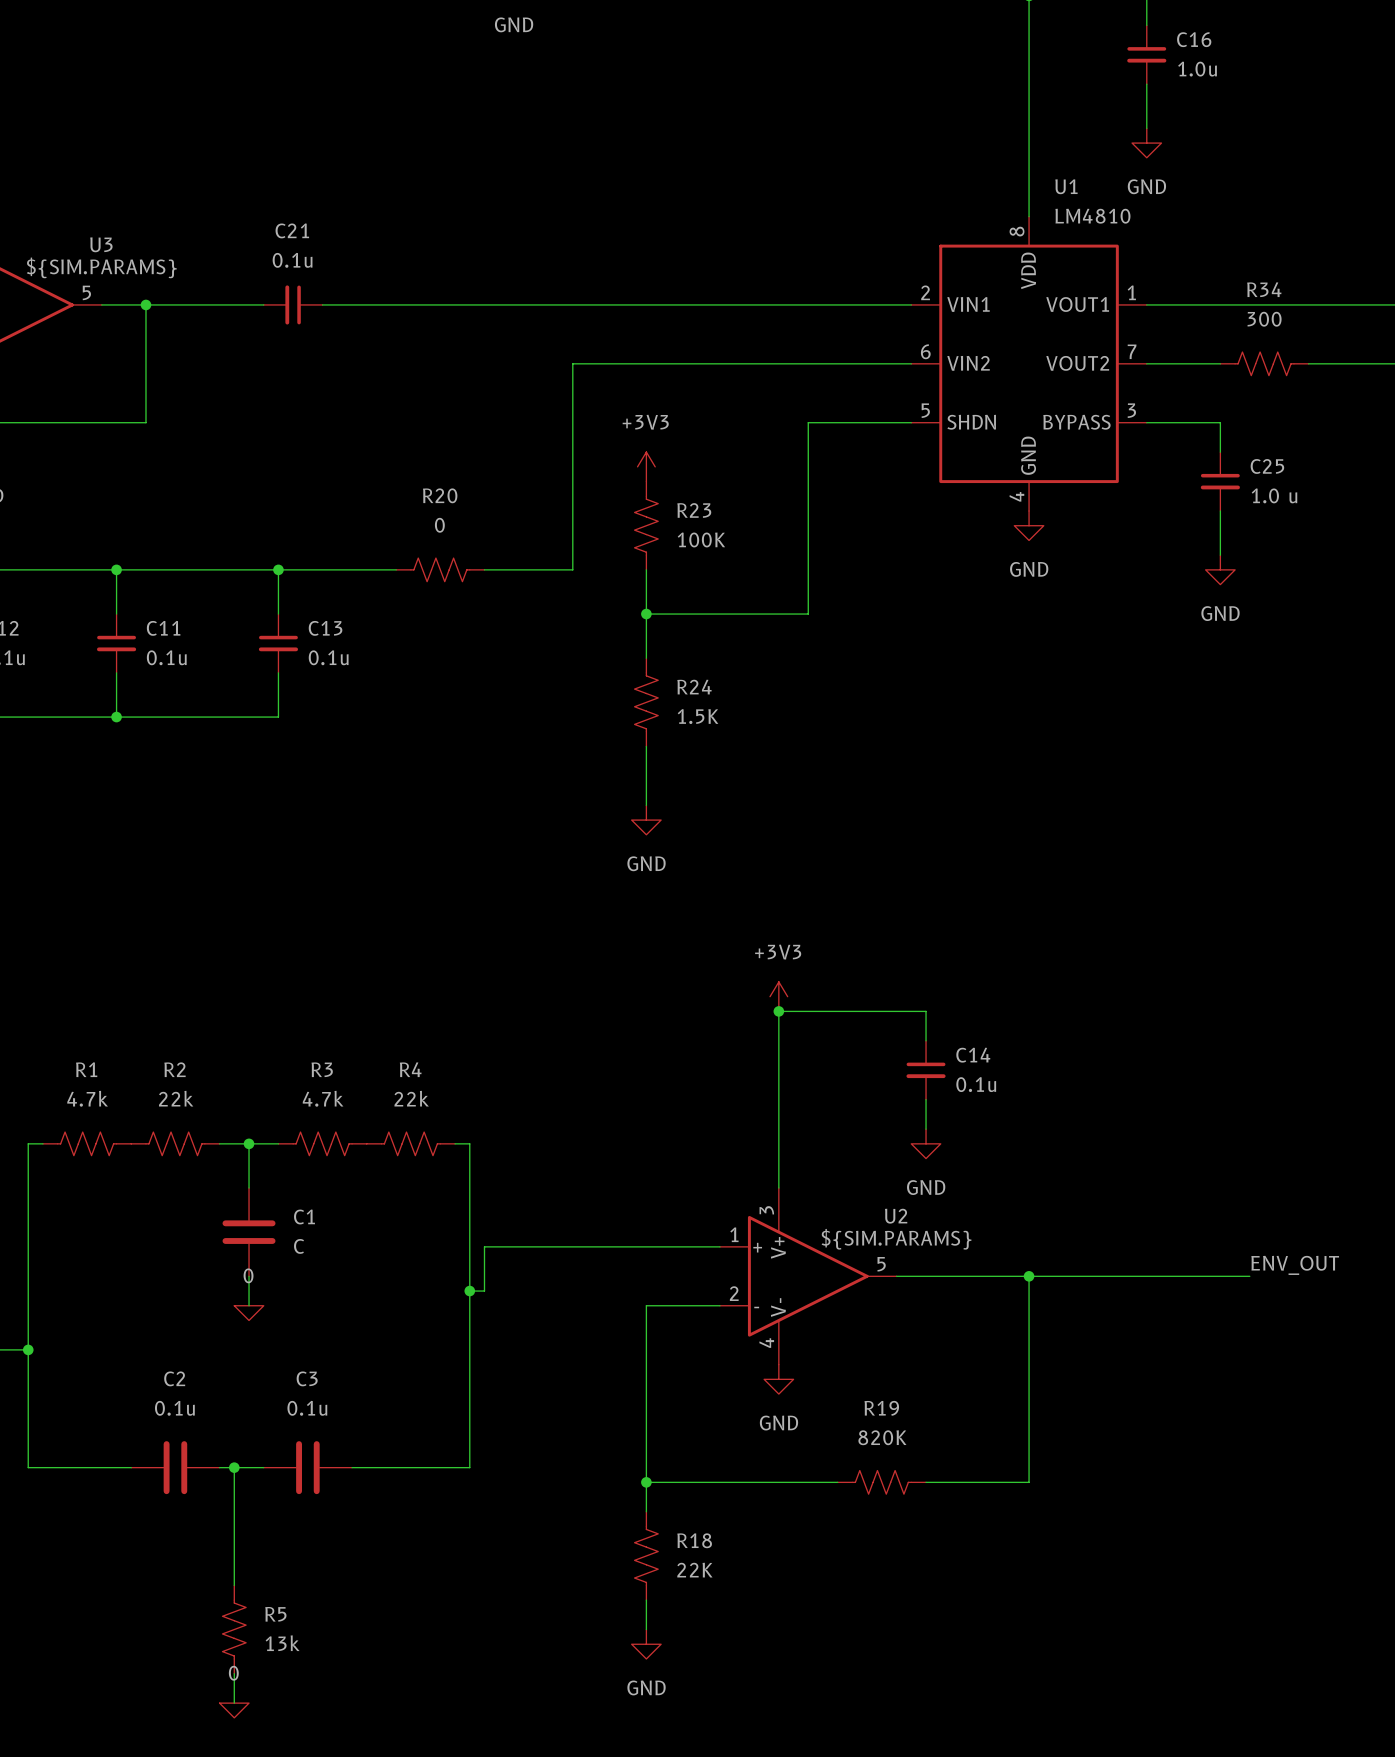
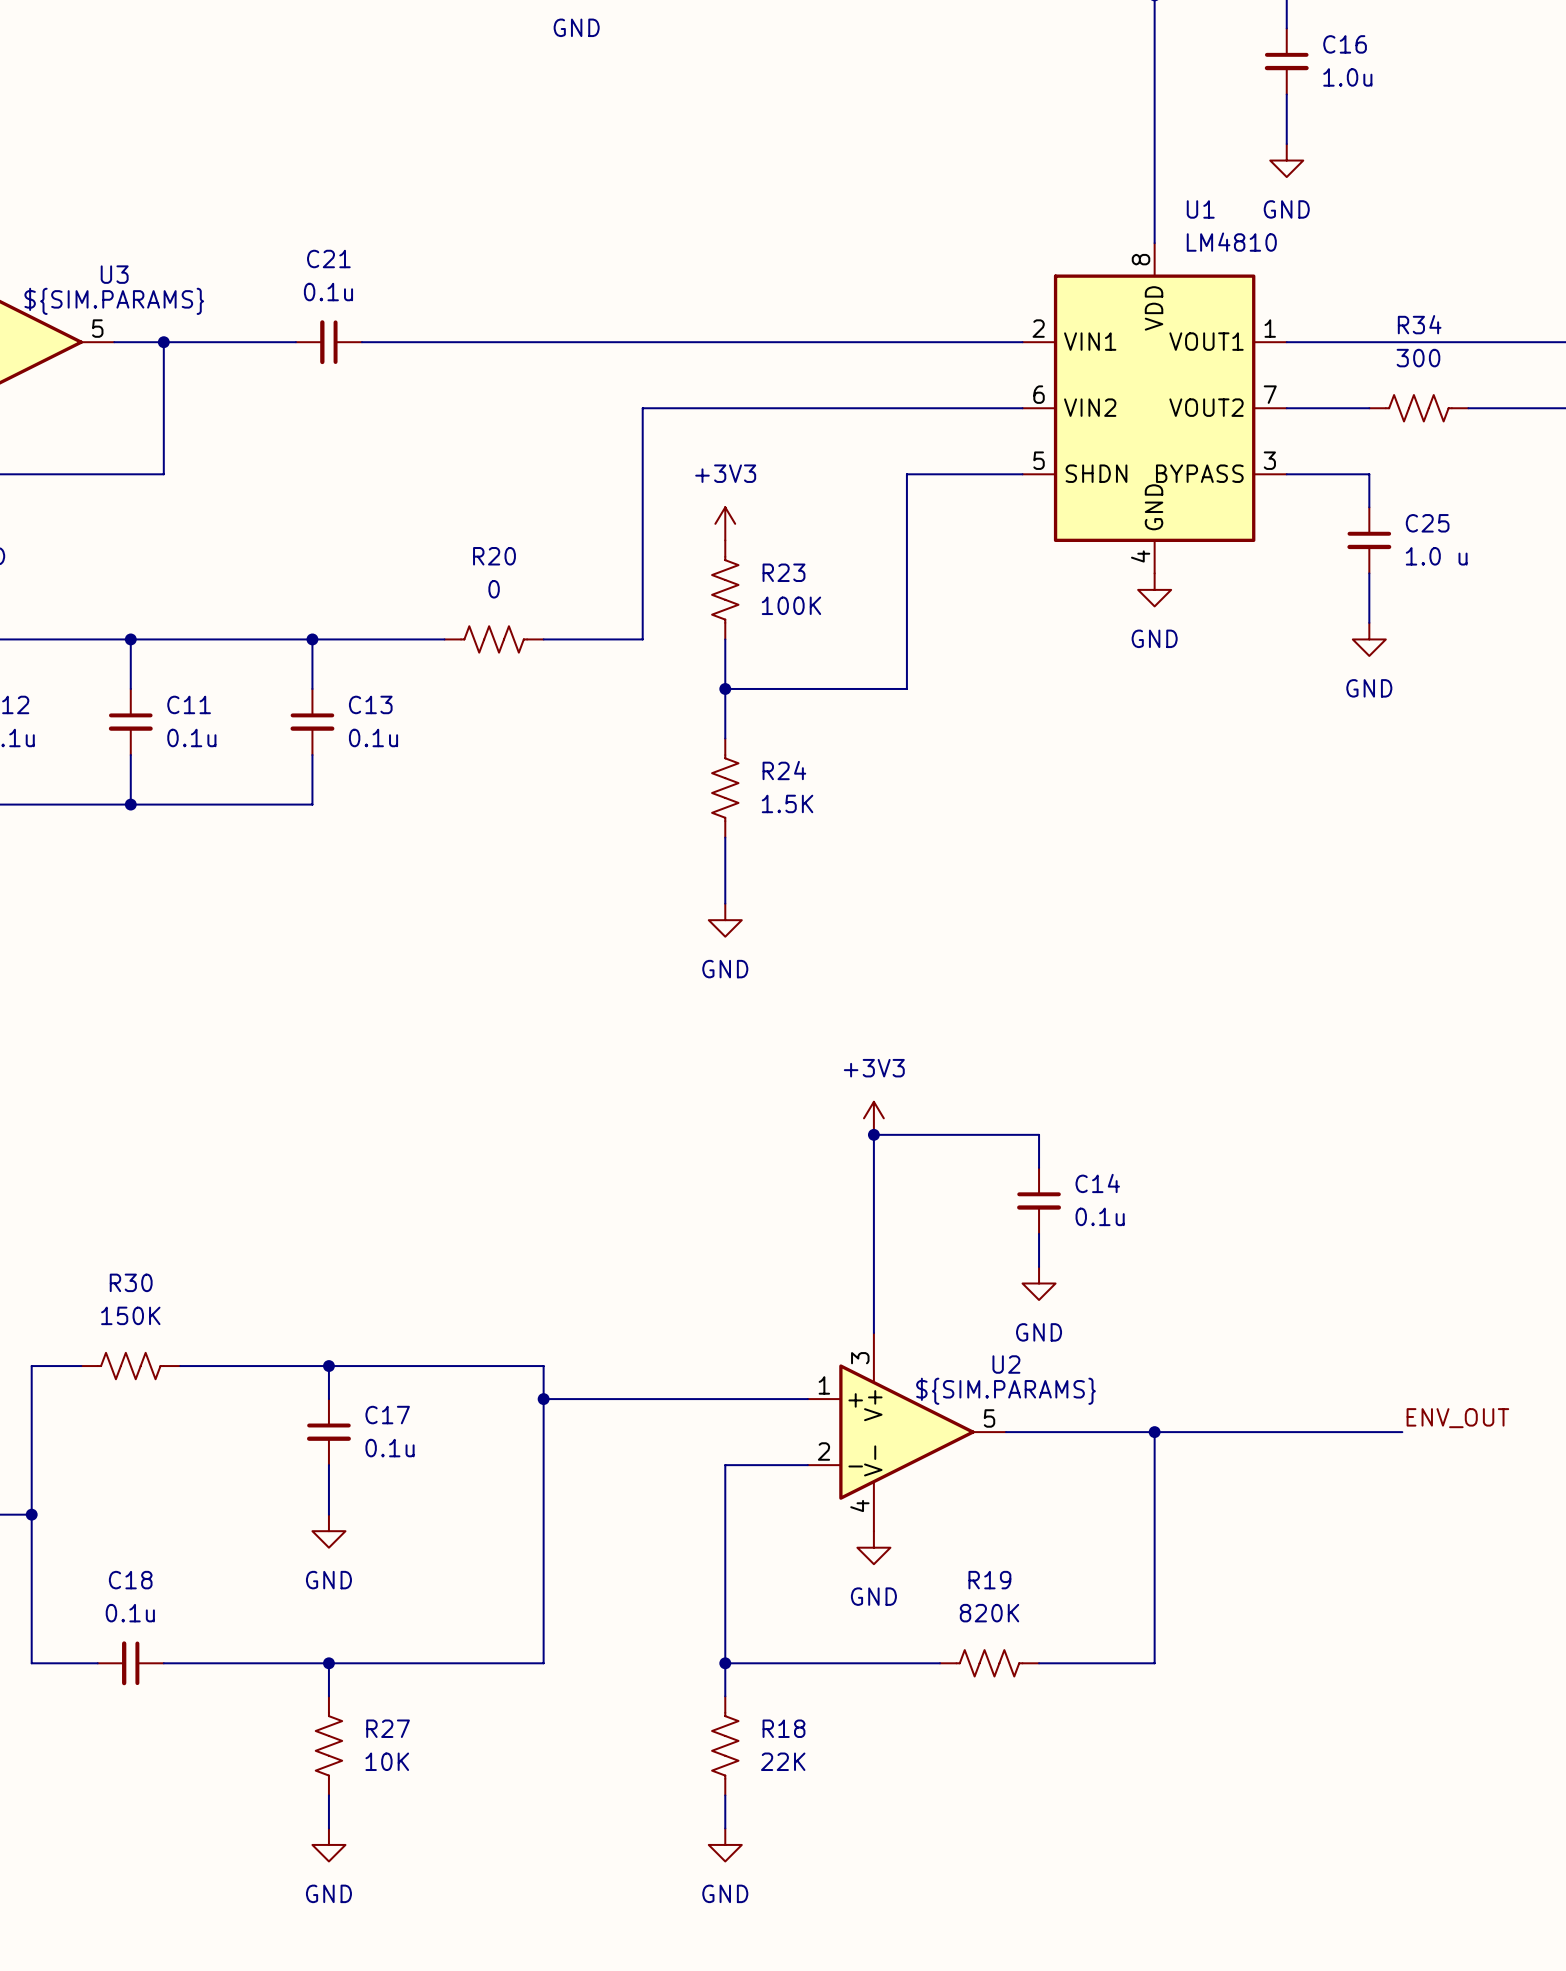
wire: (42, 1143) (28, 1143) (28, 1217) -> (81, 1366) (31, 1366)
R1: 4.7k (87, 1143) -> none
R2: 22k (175, 1143) -> none
wire: (219, 1143) (278, 1143) -> none
wire: (249, 1143) (249, 1188) -> (328, 1465) (328, 1514)
junction: (249, 1143) -> none
R3: 4.7k (322, 1143) -> none
R4: 22k (410, 1143) -> none
wire: (455, 1143) (469, 1143) (469, 1467) (352, 1467) -> none
R30: none -> 150K (130, 1366)
wire: none -> (180, 1366) (543, 1366) (543, 1399)
junction: none -> (328, 1366)
C1: C (249, 1232) -> none
wire: (249, 1276) (249, 1305) -> (328, 1366) (328, 1399)
C17: none -> 0.1u (328, 1432)
wire: (469, 1291) (484, 1291) -> (163, 1663) (543, 1663) (543, 1448)
junction position: (469, 1291) -> (543, 1399)
power symbol: 0 (249, 1313) -> none
power symbol: none -> GND (328, 1531)
wire: (28, 1467) (131, 1467) -> (31, 1646) (31, 1663) (97, 1663)
C2: 0.1u (175, 1467) -> none
wire: (219, 1467) (263, 1467) -> none
wire: (234, 1467) (234, 1585) -> none
junction position: (234, 1467) -> (328, 1663)
C3: 0.1u (307, 1467) -> none
C18: none -> 0.1u (130, 1663)
wire: none -> (328, 1663) (328, 1696)
R27: none -> 10K (328, 1745)
R5: 13k (234, 1629) -> none
power symbol: none -> GND (328, 1844)
wire: (234, 1673) (234, 1703) -> (328, 1795) (328, 1828)
power symbol: 0 (234, 1710) -> none

